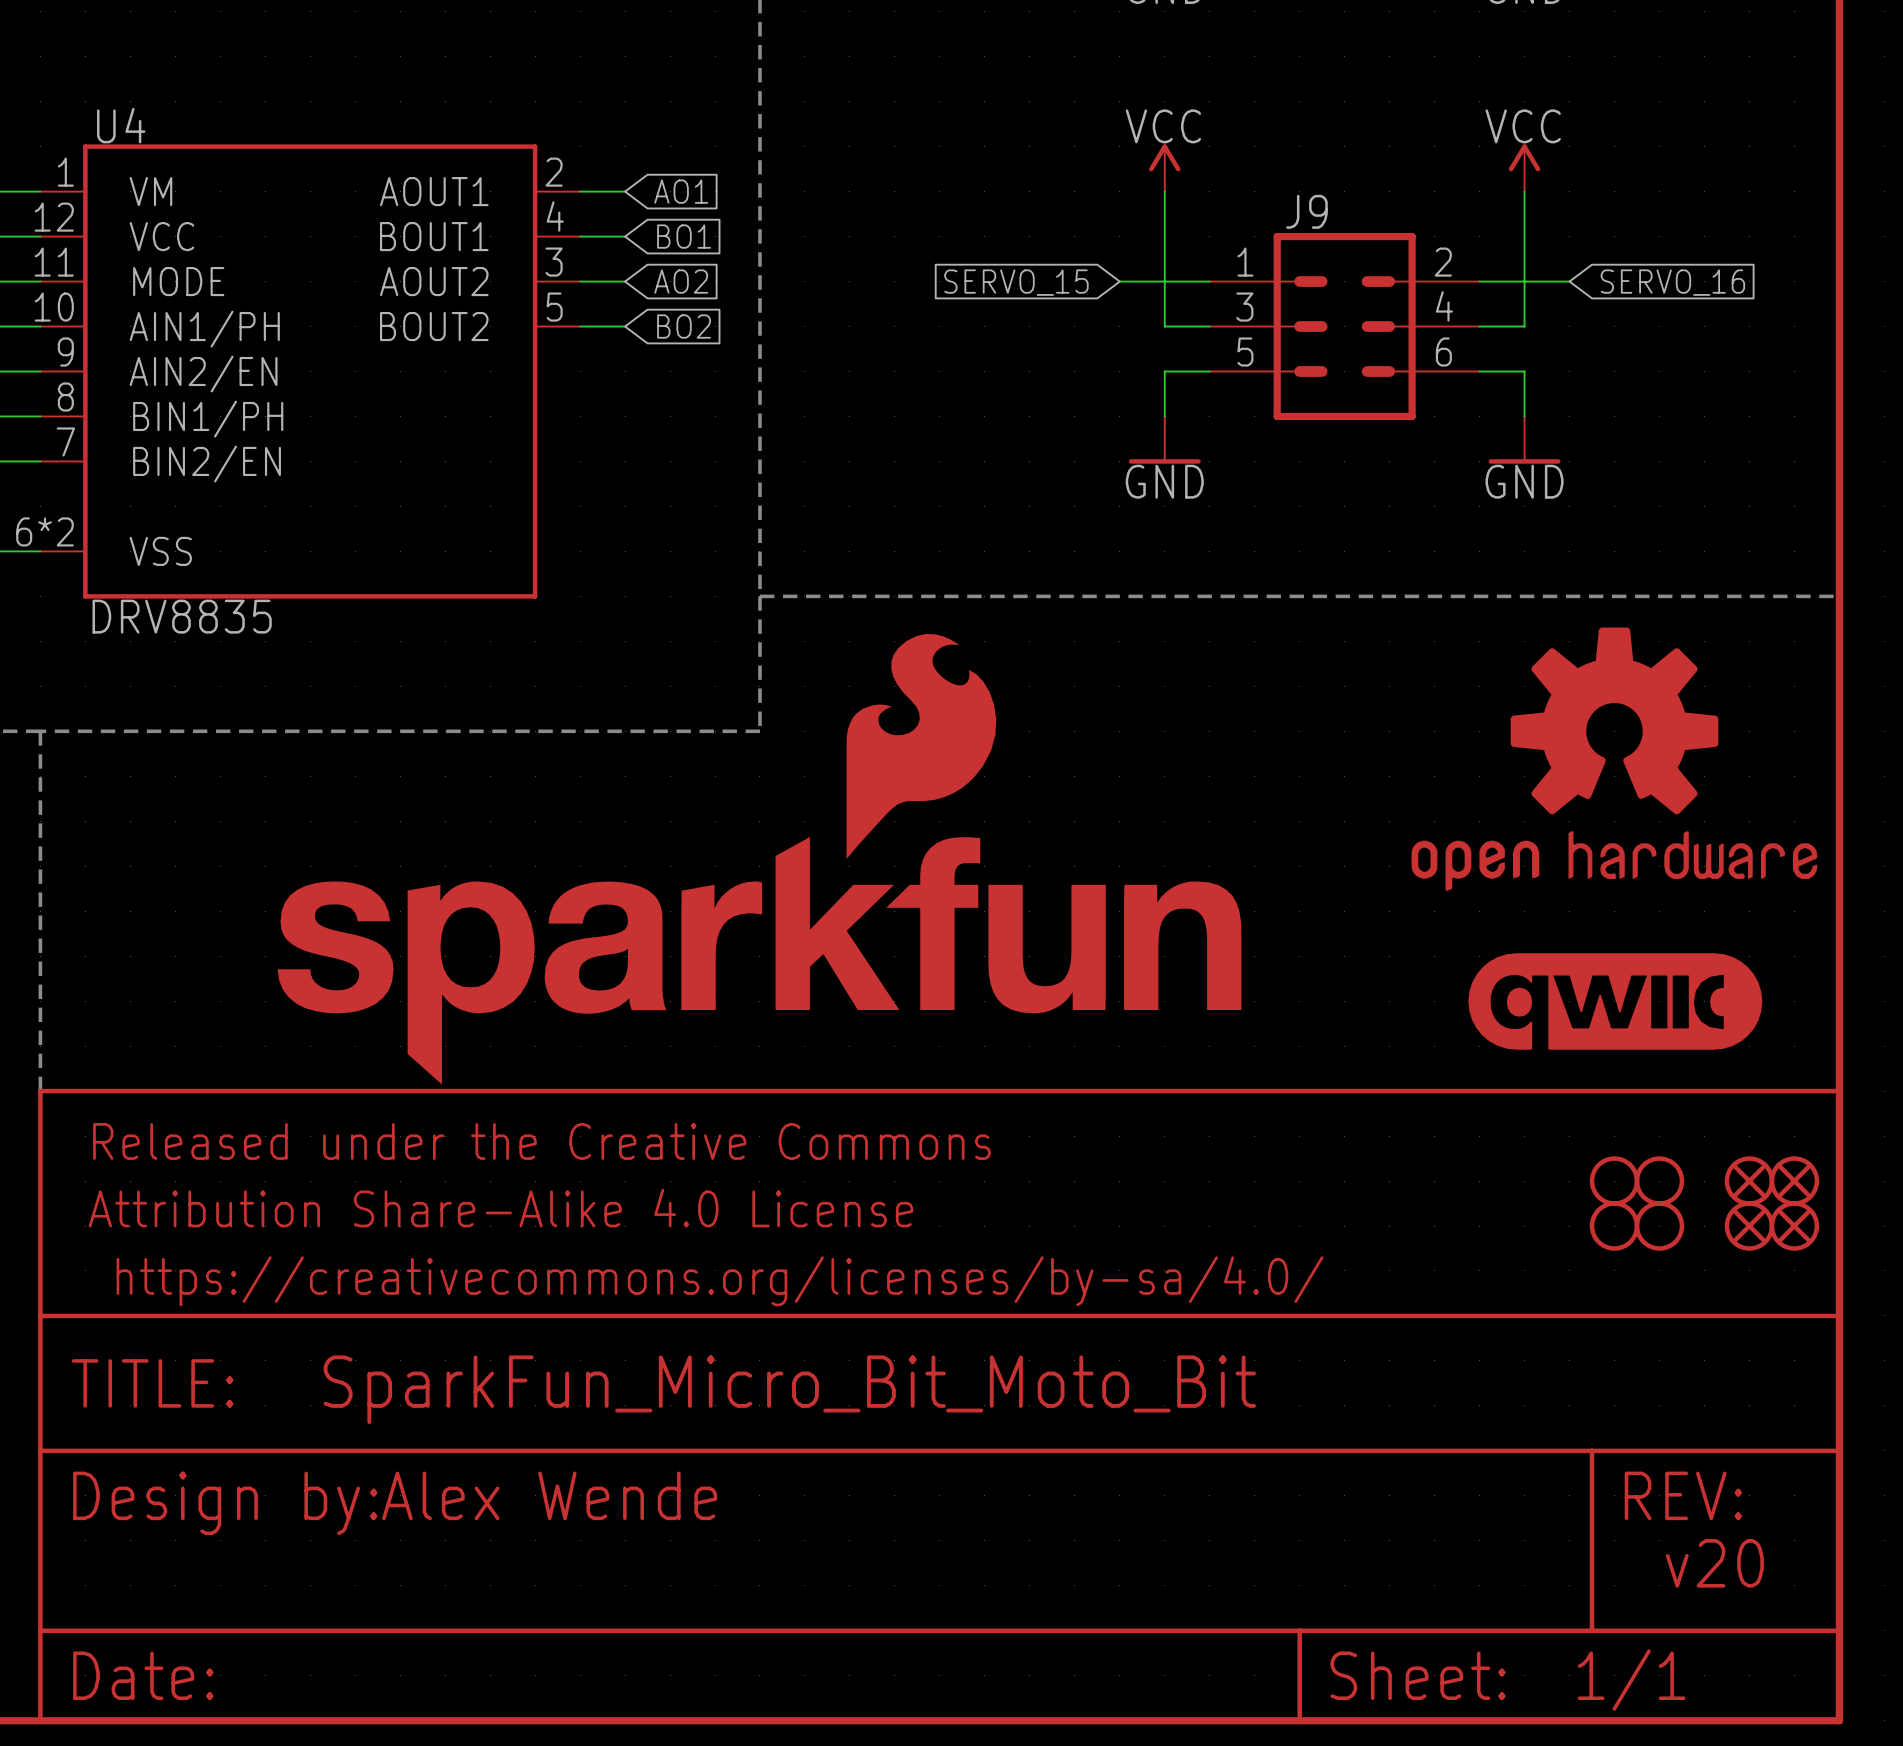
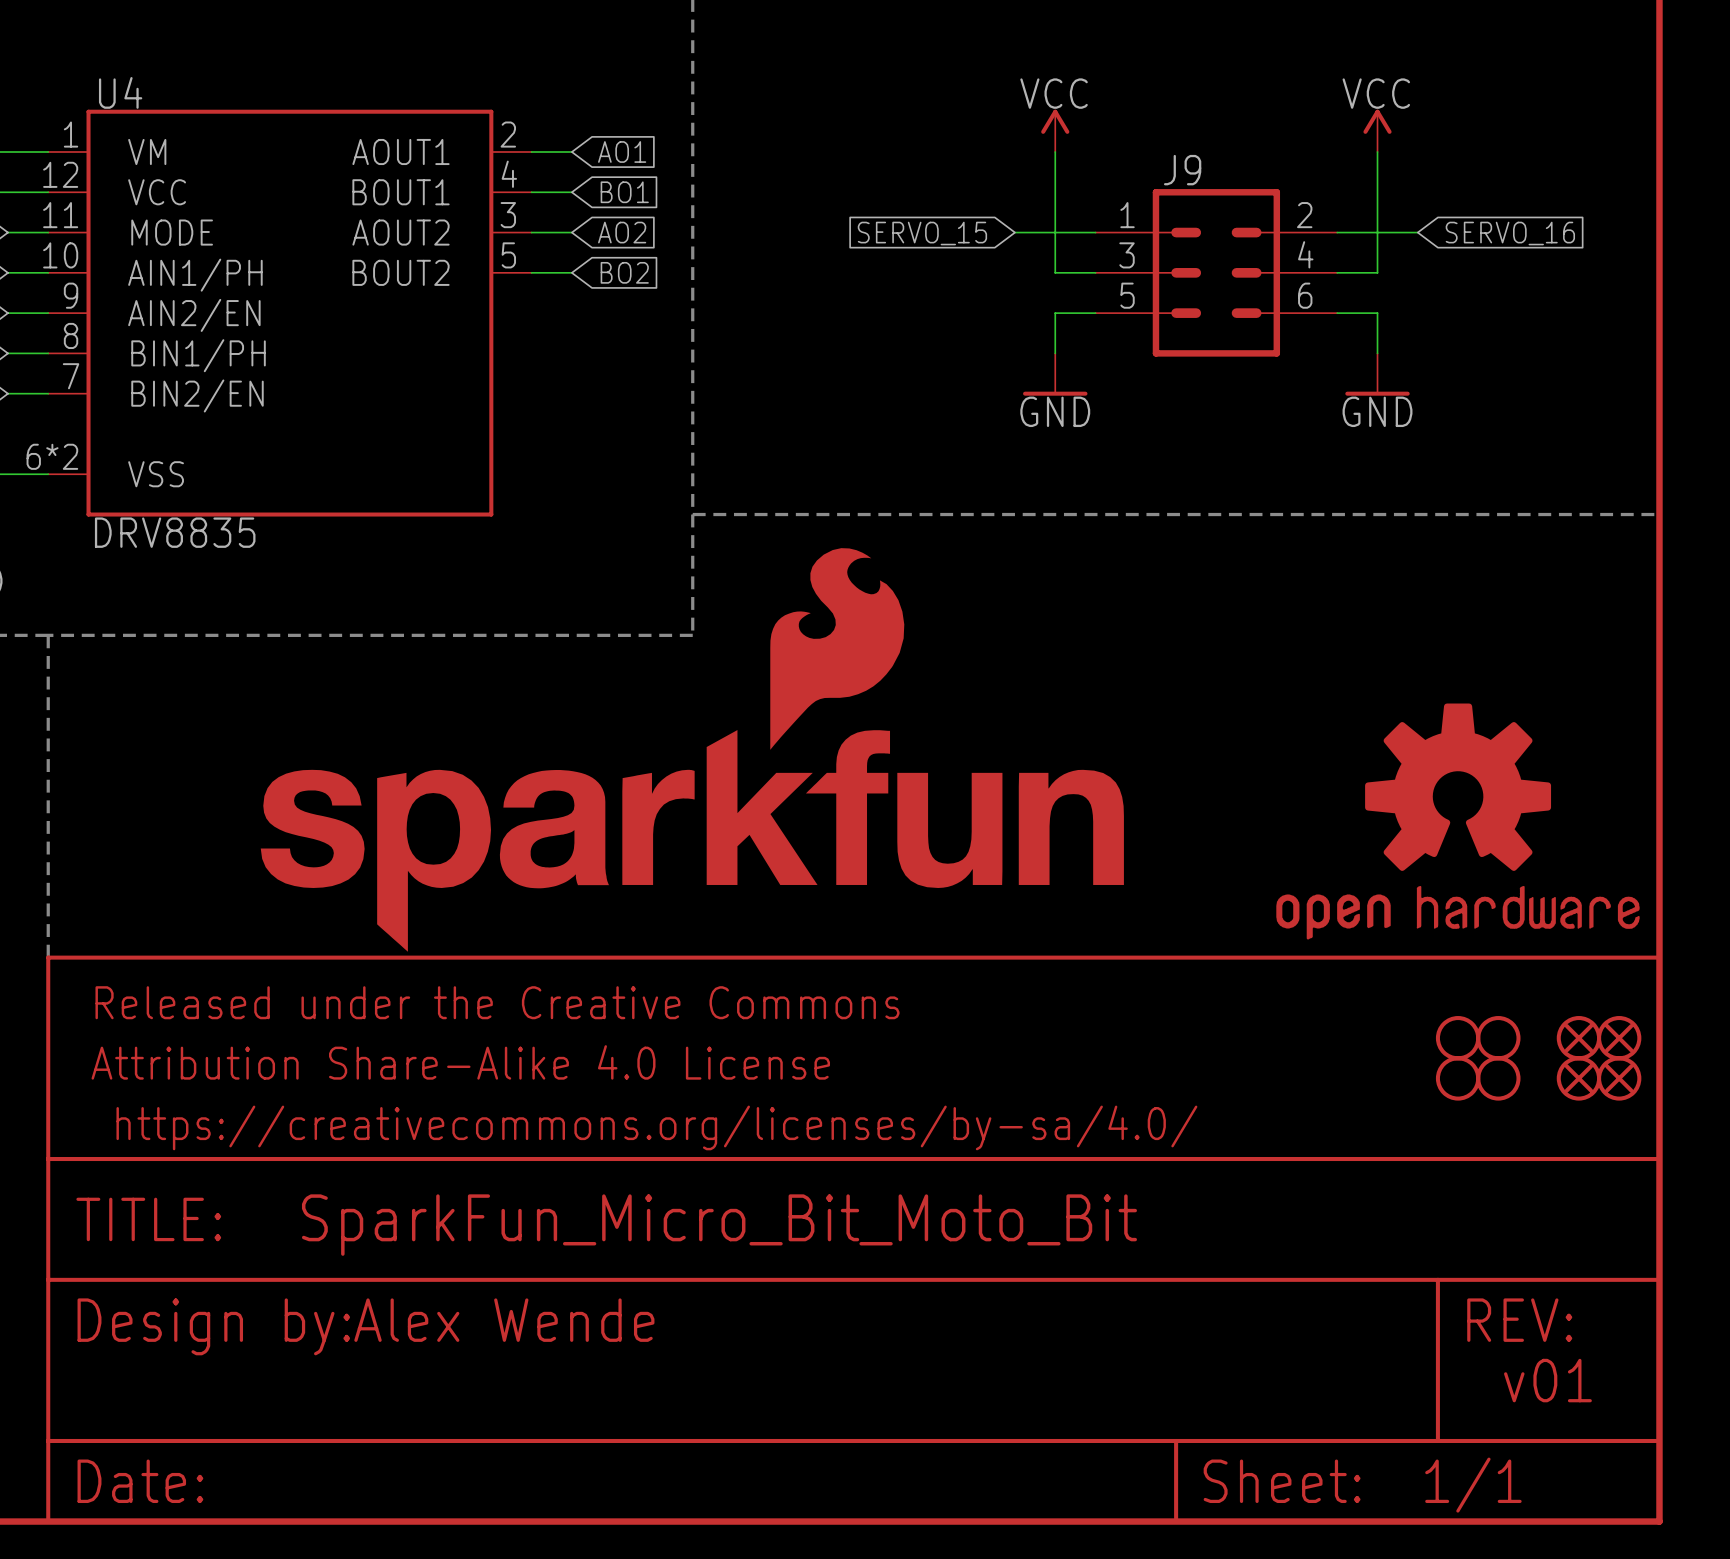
part position: (1614, 759) -> (1457, 821)
part: (1615, 1001) -> none
text: v20 (1714, 1563) -> v01 (1547, 1380)

